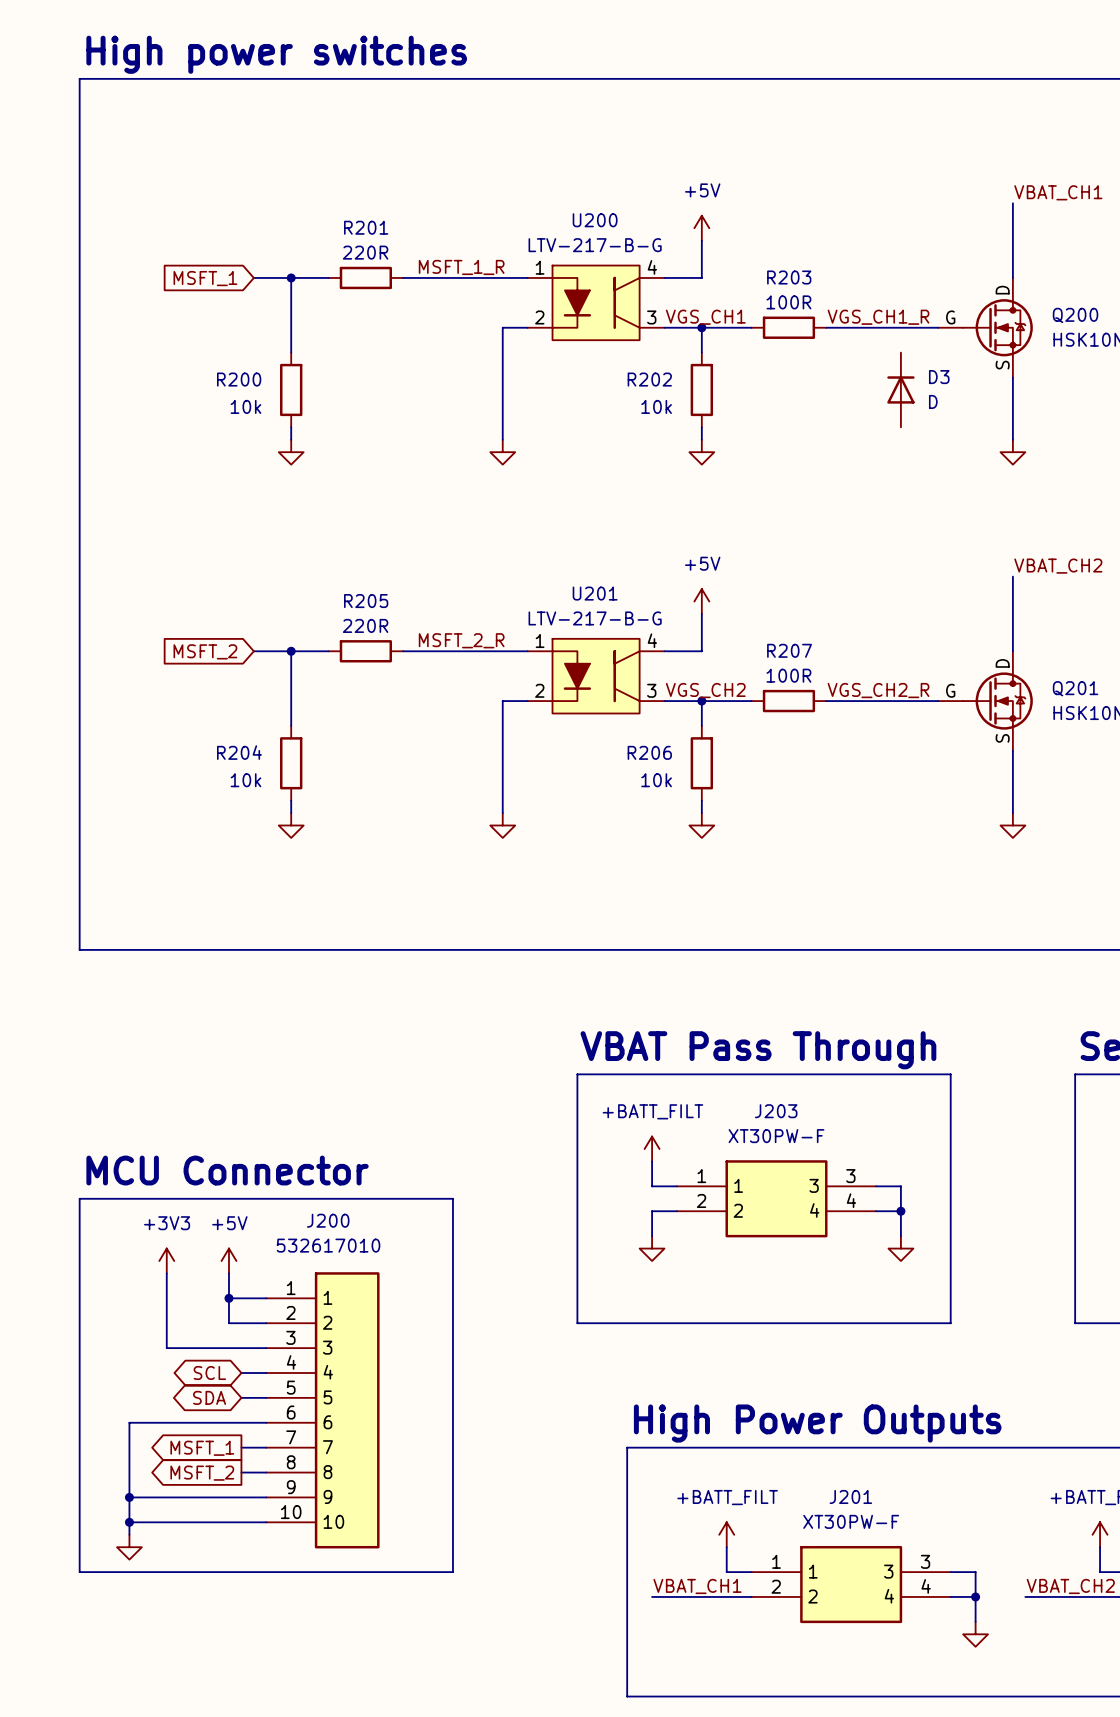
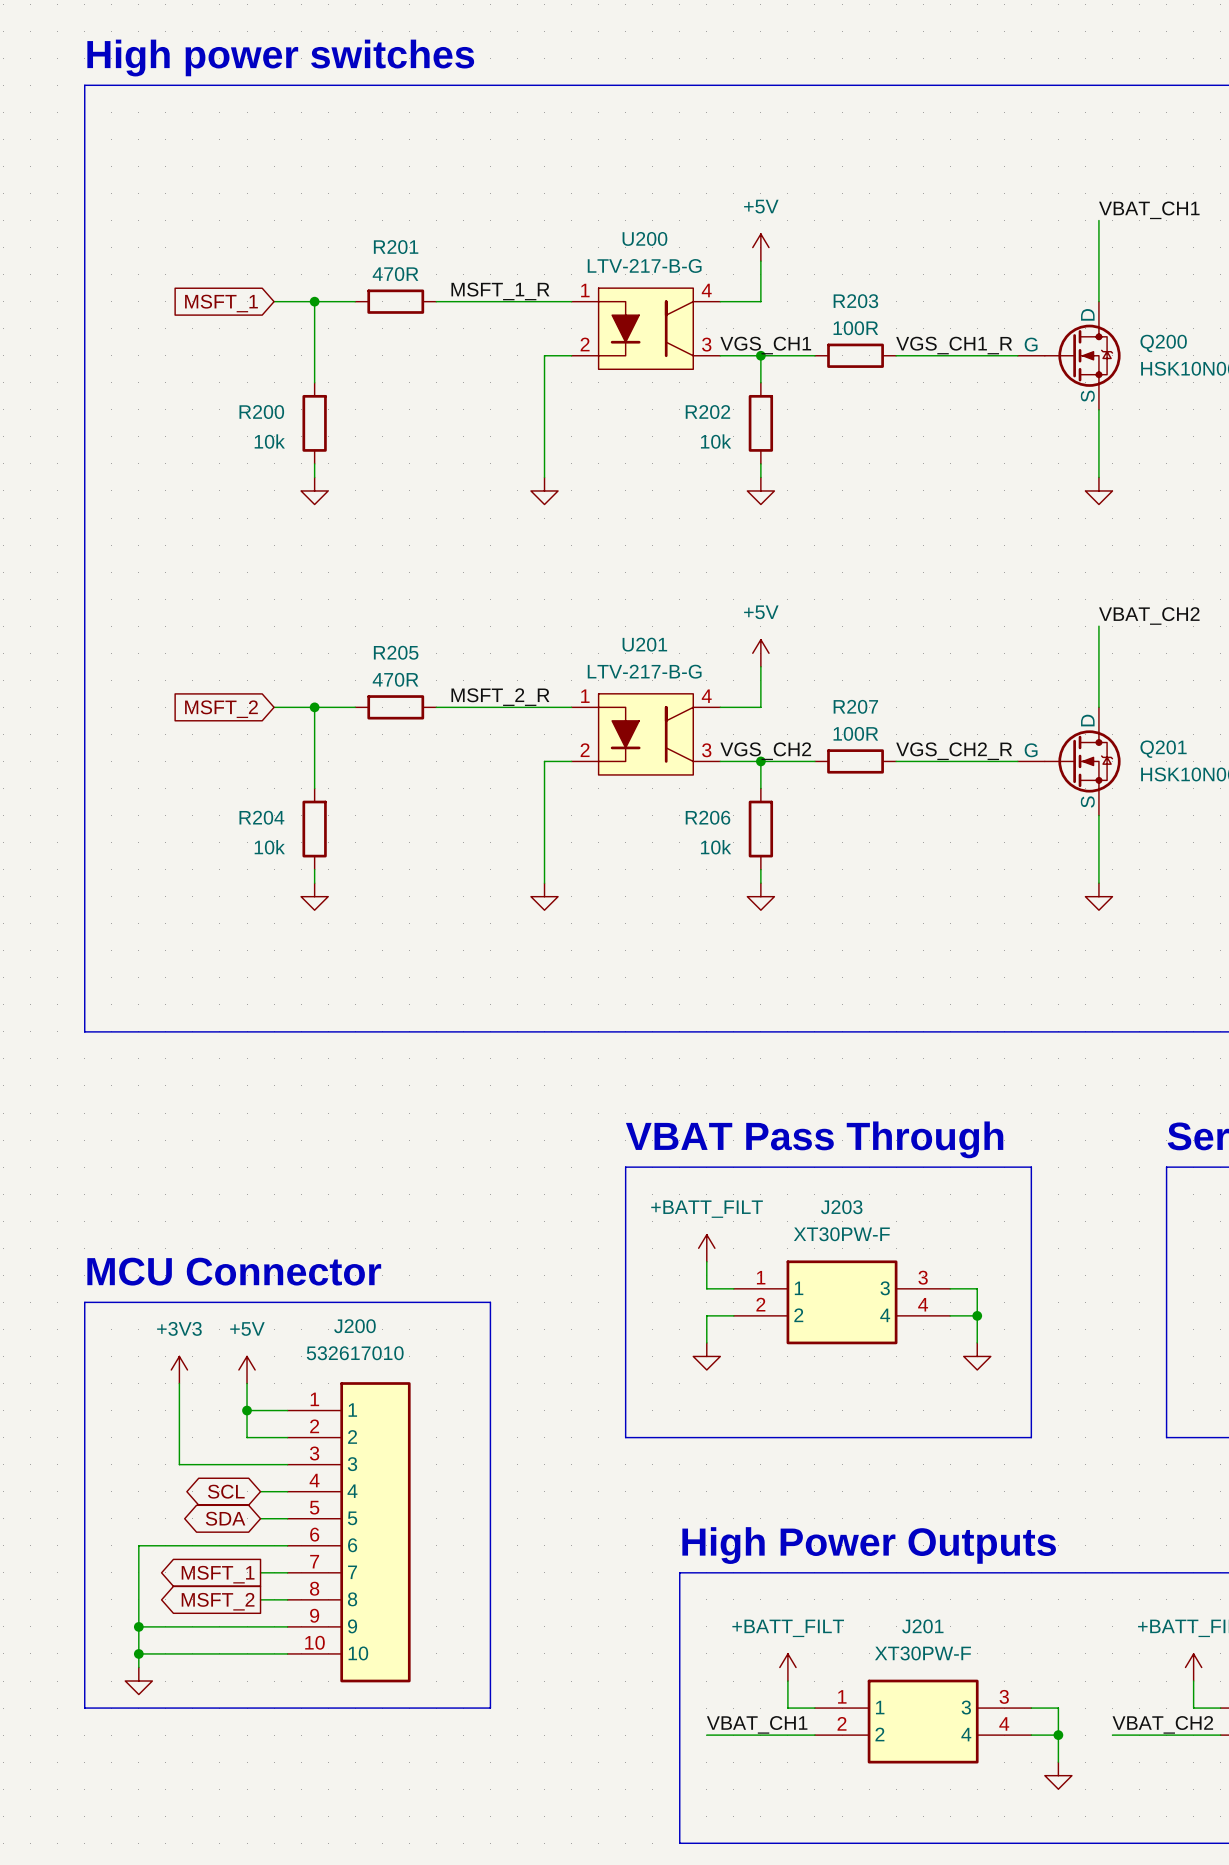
R201 value: 220R (365, 252) -> 470R (395, 274)
D3: D (900, 389) -> none
R205 value: 220R (365, 625) -> 470R (395, 679)

